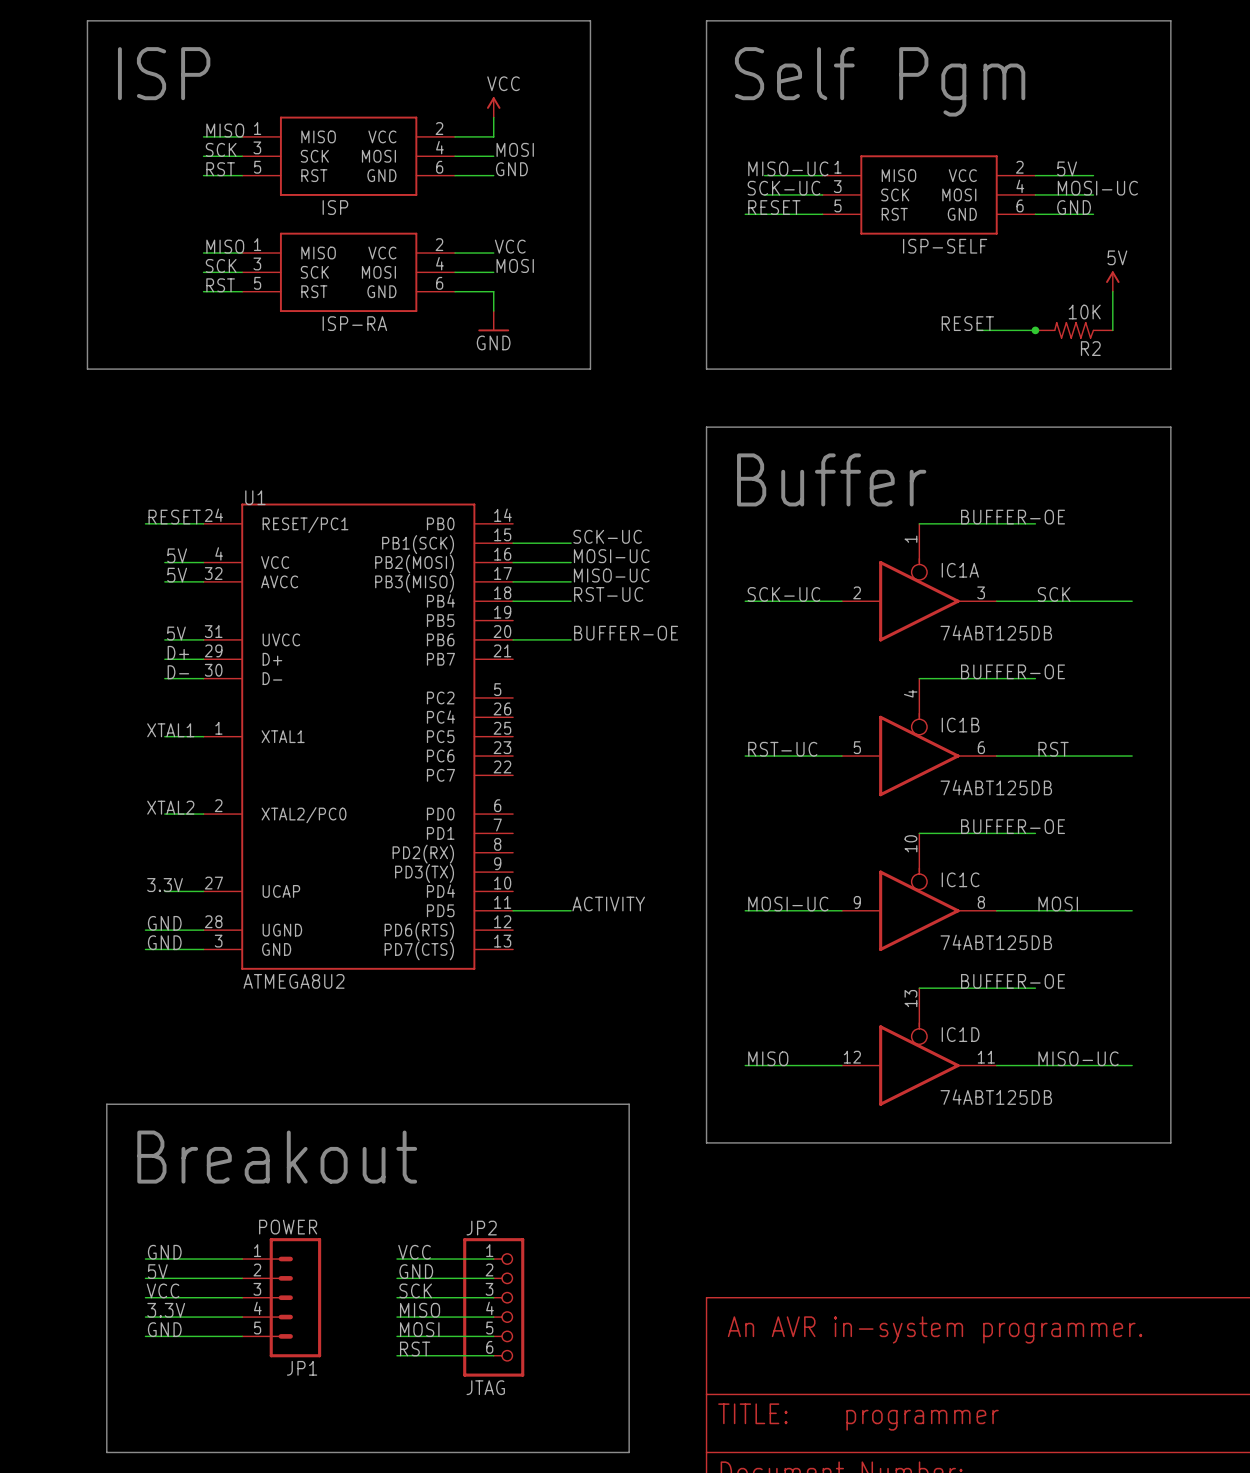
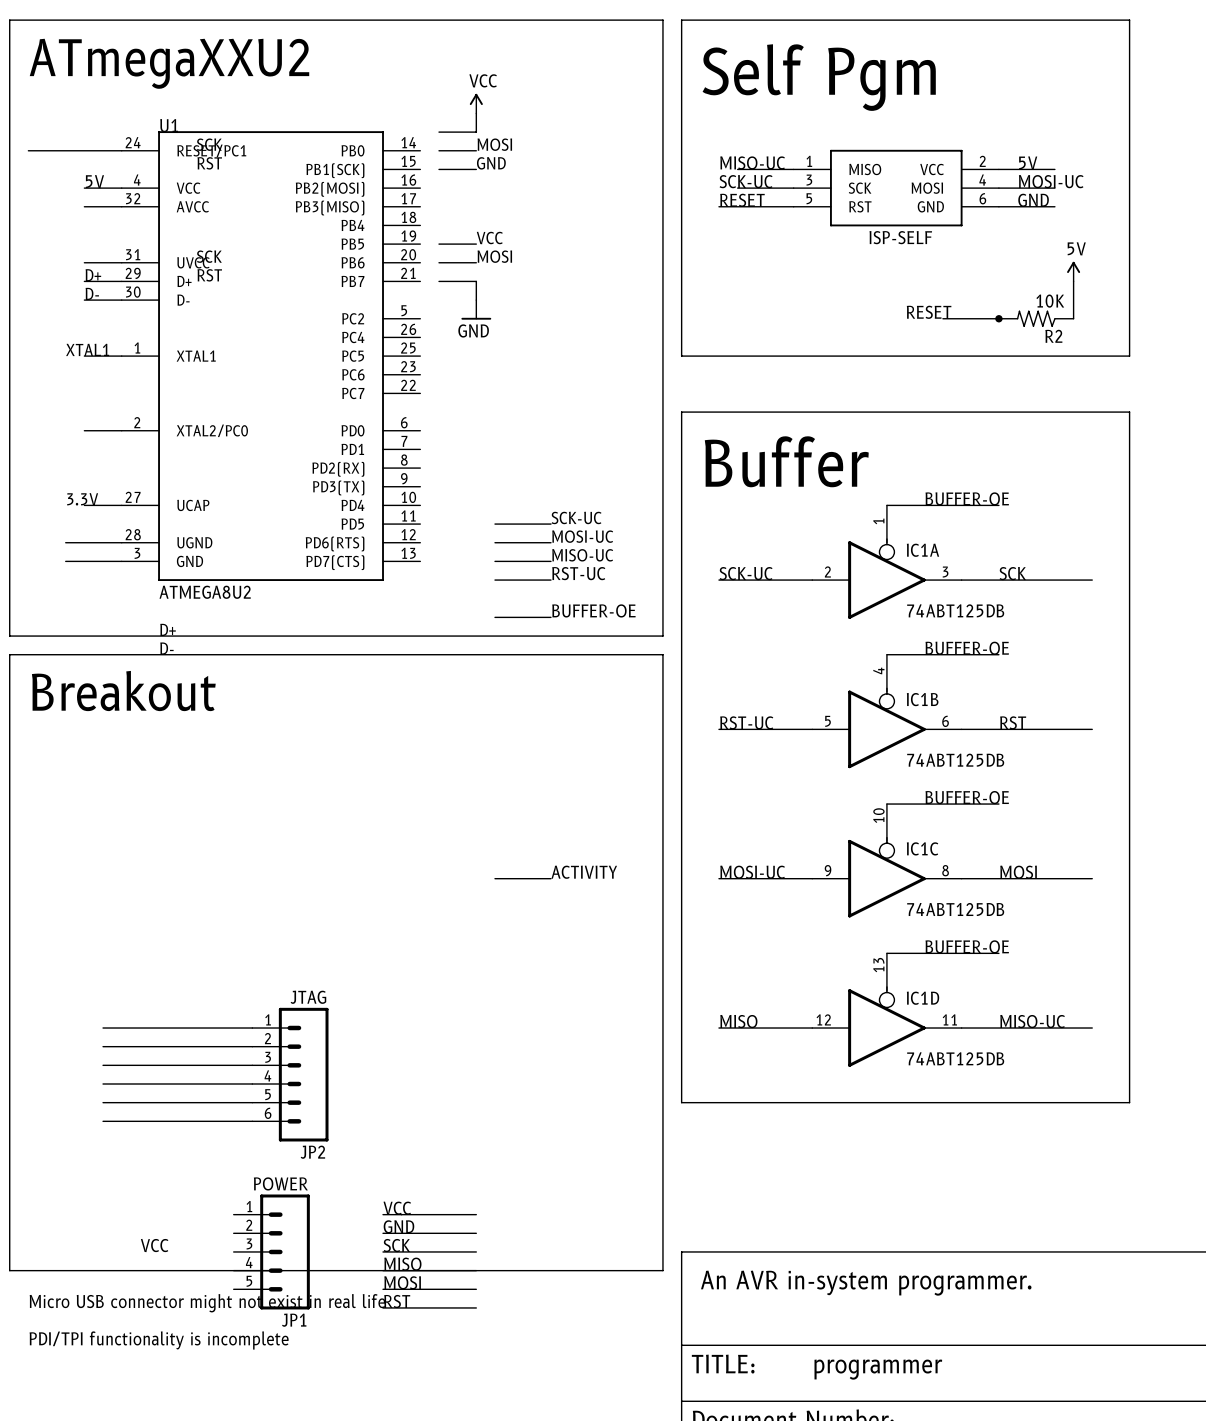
line: (87, 20) (87, 369) (590, 369) (590, 20) -> (84, 20) (9, 20) (9, 636) (662, 636) (662, 20) (569, 20)
text: none -> ATmegaXXU2 (169, 63)
text: ISP (164, 73) -> none
label: MISO (225, 130) -> none
wire: none -> (28, 150) (121, 150)
wire: (203, 156) (242, 156) -> (84, 206) (121, 206)
ISP: (348, 156) -> none
wire: (203, 175) (242, 175) -> (84, 188) (121, 188)
label: none -> 5V (94, 181)
label: MISO (225, 246) -> none
wire: (203, 253) (242, 253) -> (84, 262) (121, 262)
wire: (203, 272) (242, 272) -> (84, 281) (121, 281)
ISP-RA: (348, 272) -> none
label: none -> D+ (93, 275)
wire: (203, 291) (242, 291) -> (84, 300) (121, 300)
label: none -> D- (92, 293)
label: none -> XTAL1 (87, 349)
label: none -> 3.3V (82, 499)
label: RESET (174, 517) -> none
wire: (145, 523) (203, 523) -> (65, 542) (121, 542)
label: 5V (177, 555) -> none
wire: (164, 562) (203, 562) -> (84, 430) (121, 430)
label: 5V (177, 575) -> none
wire: none -> (65, 561) (121, 561)
wire: (164, 581) (203, 581) -> none
label: 5V (176, 633) -> none
wire: (164, 639) (203, 639) -> (84, 505) (121, 505)
line: none -> (9, 654) (662, 654) (662, 1270) (9, 1270) (9, 654)
text: none -> Breakout (123, 691)
label: XTAL1 (170, 730) -> none
wire: (164, 736) (203, 736) -> none
U1 position: (358, 736) -> (271, 356)
label: XTAL2 (170, 807) -> none
wire: (164, 814) (203, 814) -> none
label: 3.3V (165, 885) -> none
wire: (164, 891) (203, 891) -> none
label: GND (164, 923) -> none
wire: (145, 930) (203, 930) -> none
label: GND (164, 942) -> none
wire: (145, 949) (203, 949) -> none
wire: none -> (103, 1028) (252, 1028)
wire: none -> (103, 1046) (252, 1046)
line: (106, 1104) (629, 1104) (629, 1452) (106, 1452) (106, 1104) -> none
wire: none -> (103, 1083) (252, 1083)
wire: none -> (103, 1102) (252, 1102)
text: Breakout (277, 1157) -> none
wire: none -> (103, 1121) (252, 1121)
JP2 name position: JP2 (481, 1228) -> JP2 (312, 1152)
JP2 symbol: [463, 1238, 525, 1377] -> [252, 1007, 329, 1142]
label: GND (164, 1252) -> none
wire: (145, 1259) (242, 1259) -> none
label: 5V (157, 1271) -> none
wire: (145, 1278) (242, 1278) -> none
wire: (145, 1297) (242, 1297) -> none
label: 3.3V (166, 1310) -> none
label: GND (164, 1329) -> none
wire: (145, 1336) (242, 1336) -> none
text: none -> Micro USB connector might not exist in real life (207, 1303)
JP2 value position: JTAG (485, 1387) -> JTAG (308, 997)
text: none -> PDI/TPI functionality is incomplete (159, 1340)

